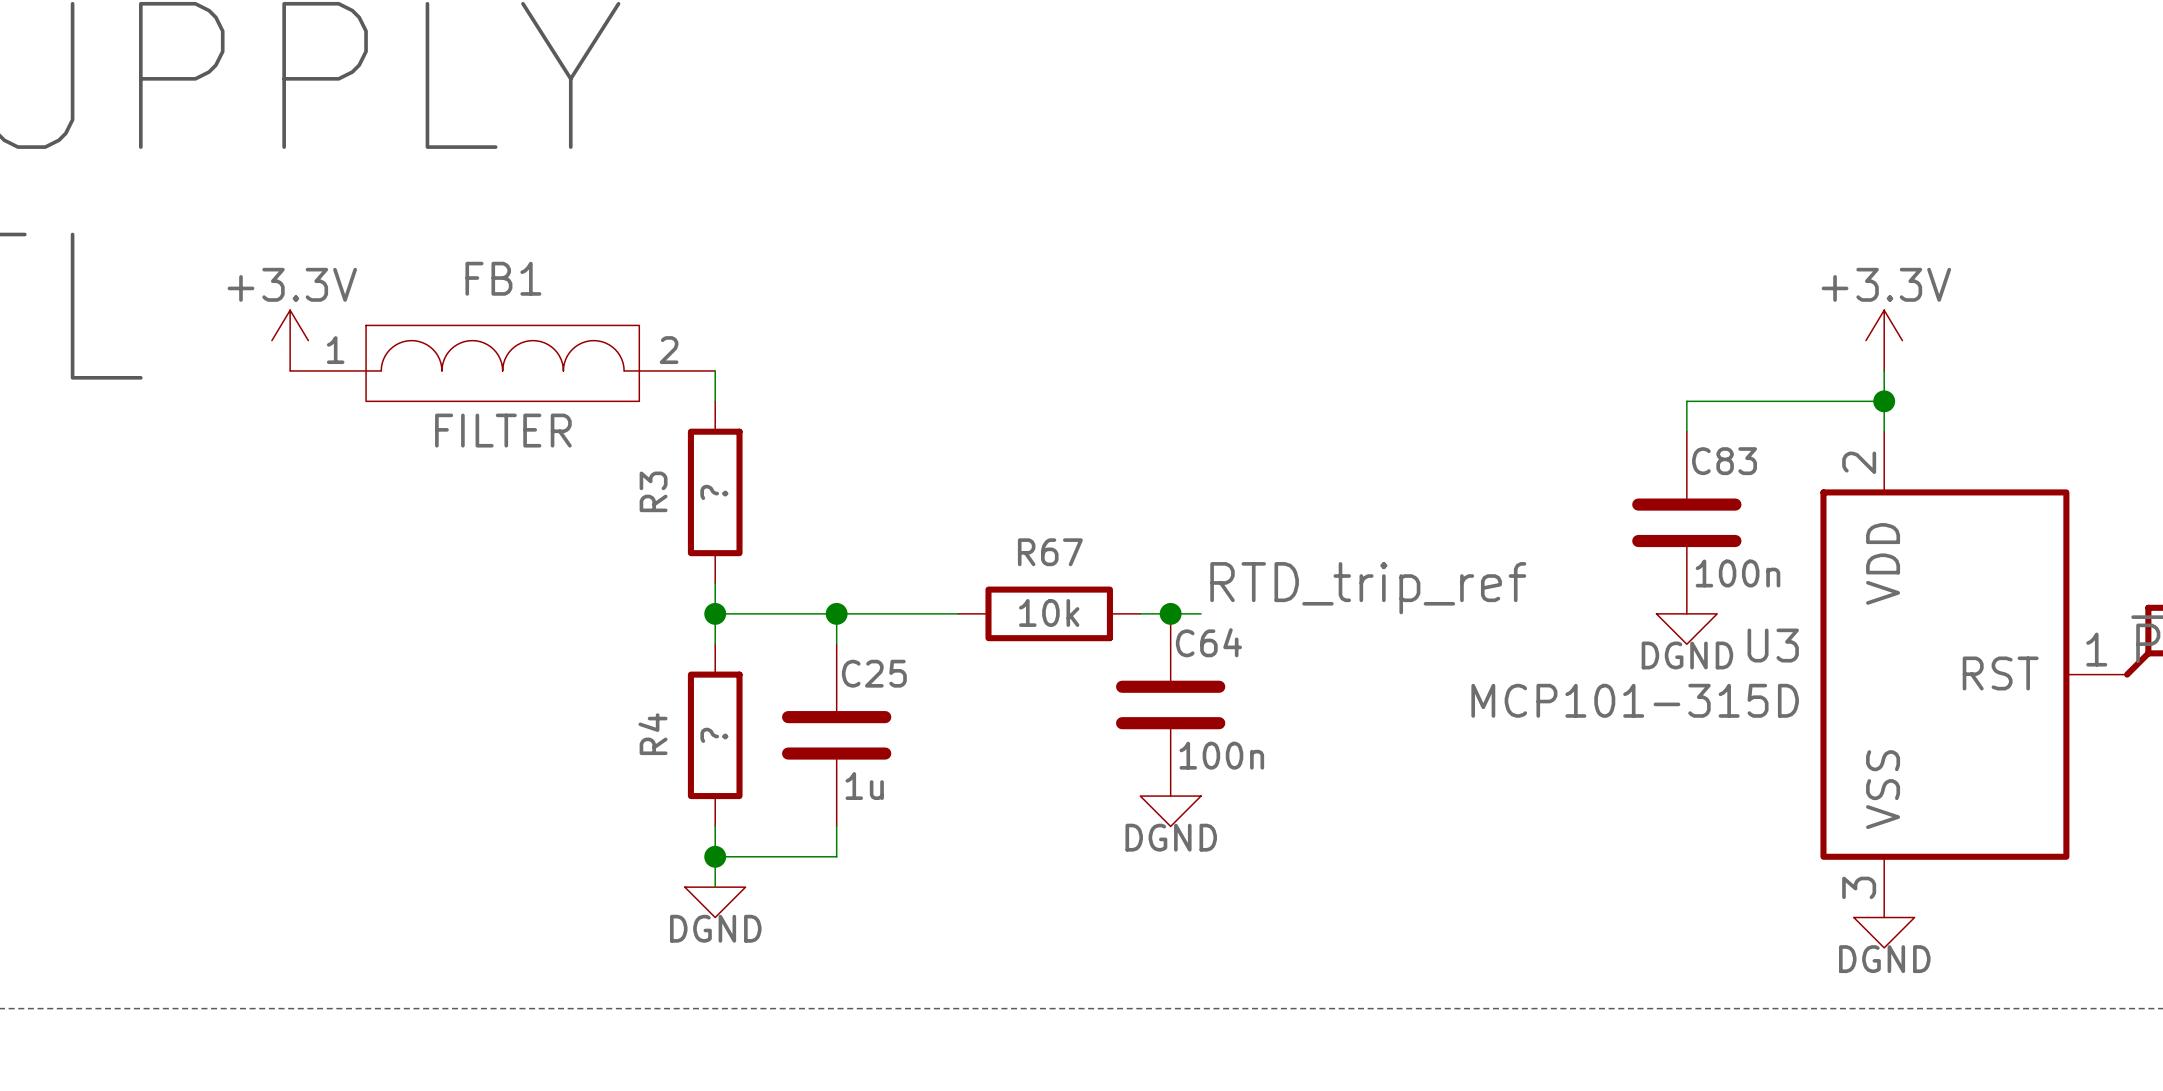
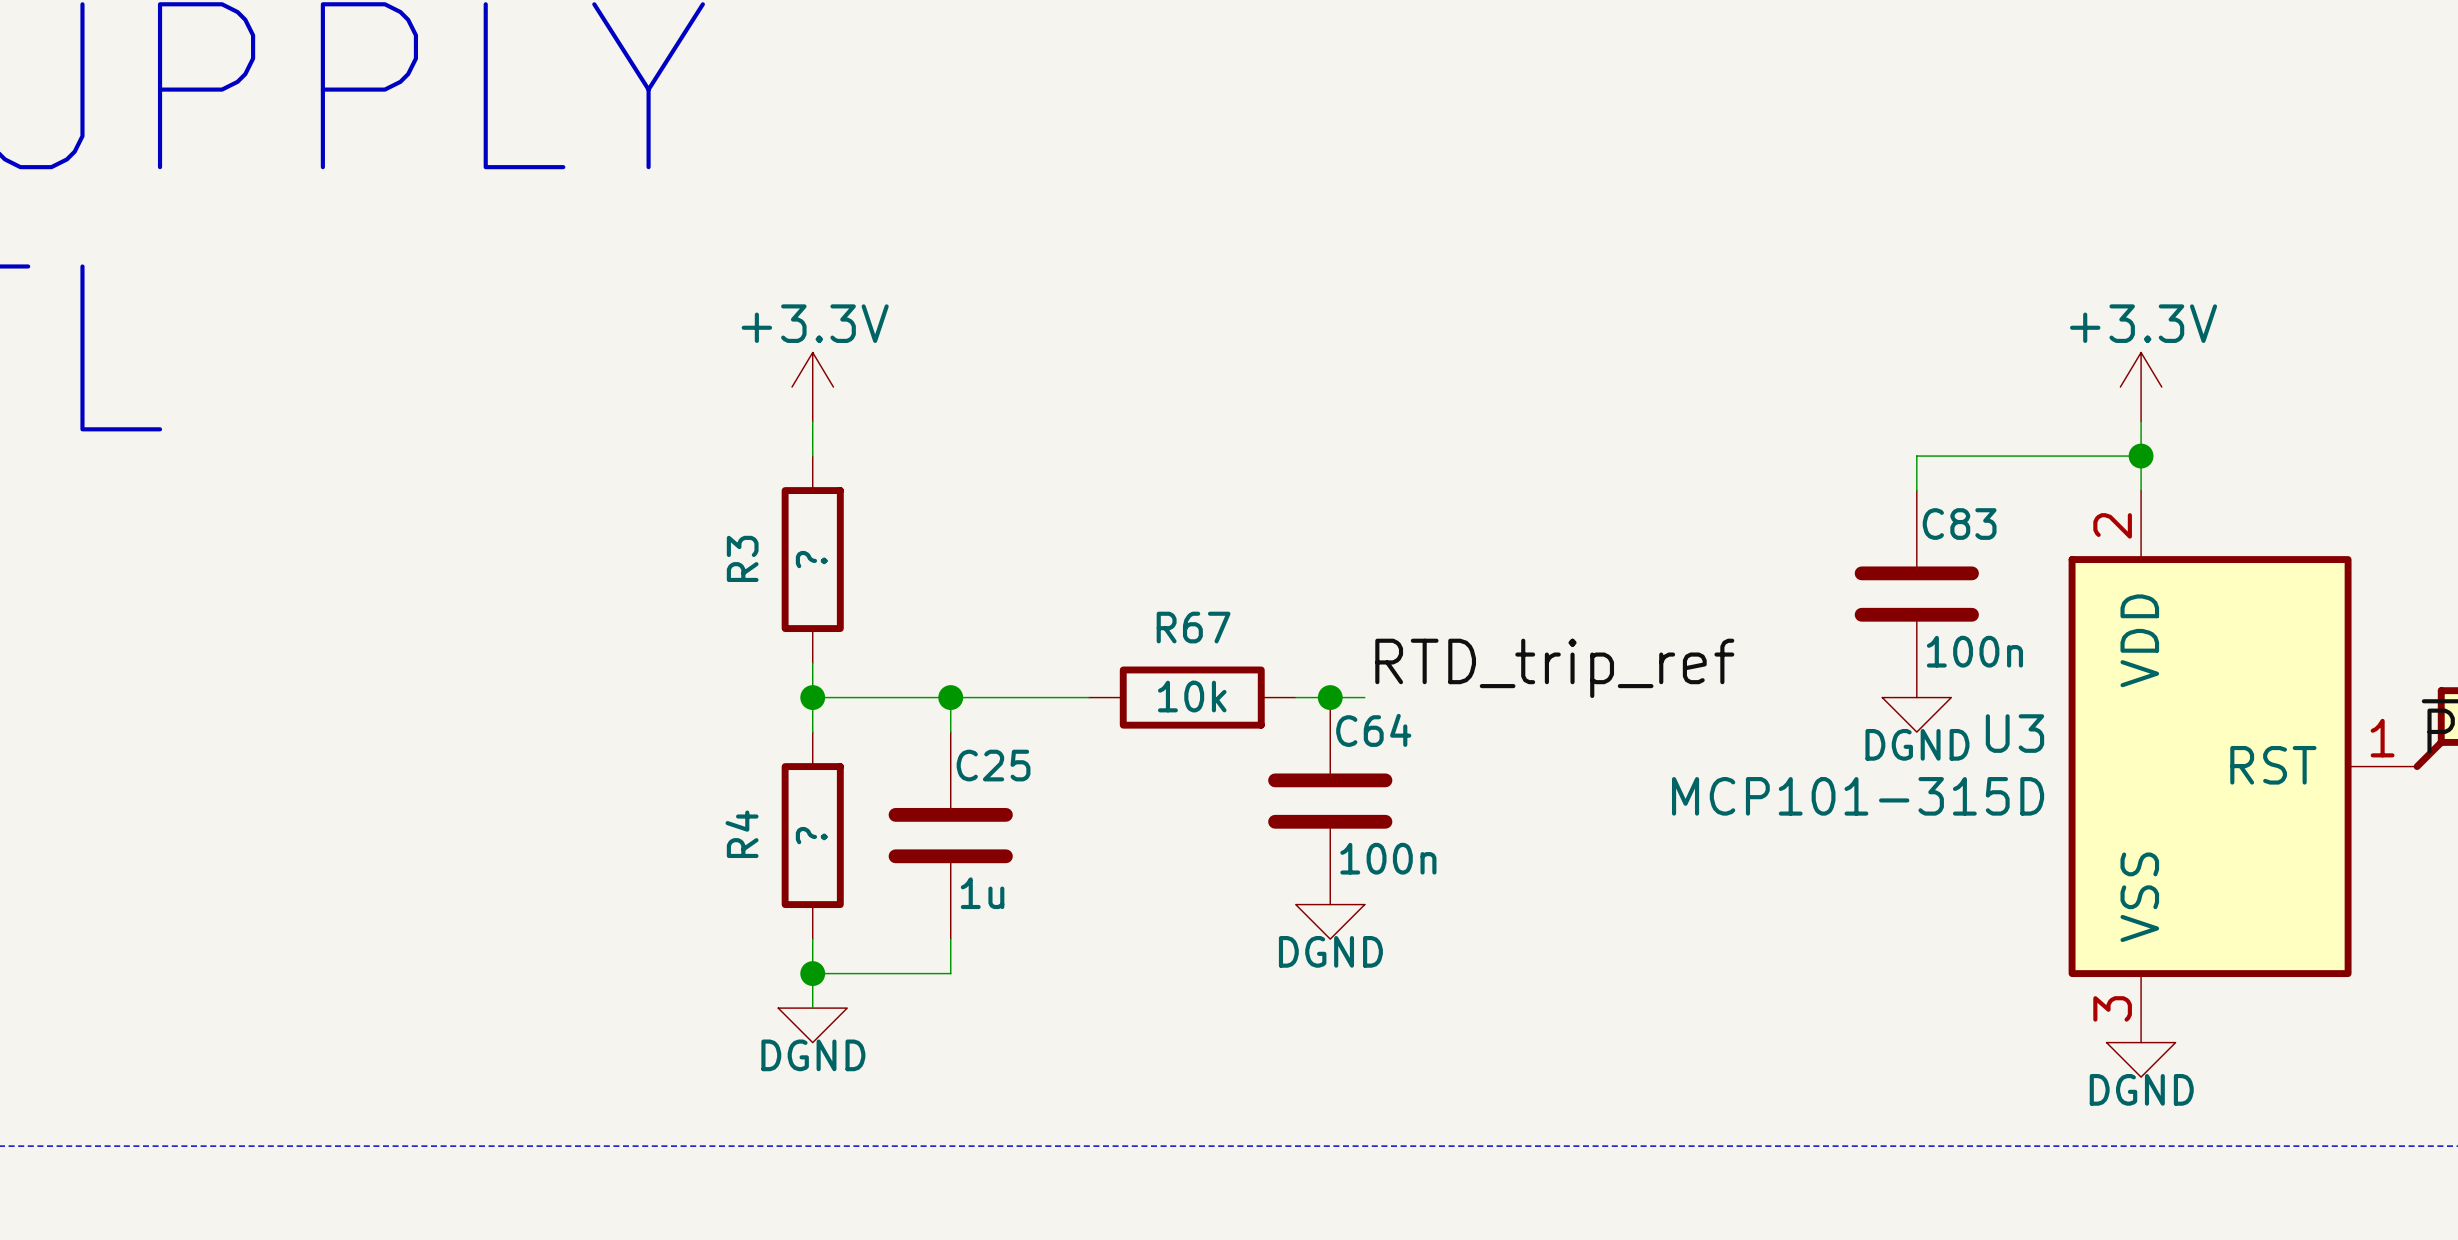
power symbol position: +3.3V (290, 340) -> +3.3V (812, 387)
FB1: FILTER (502, 363) -> none

